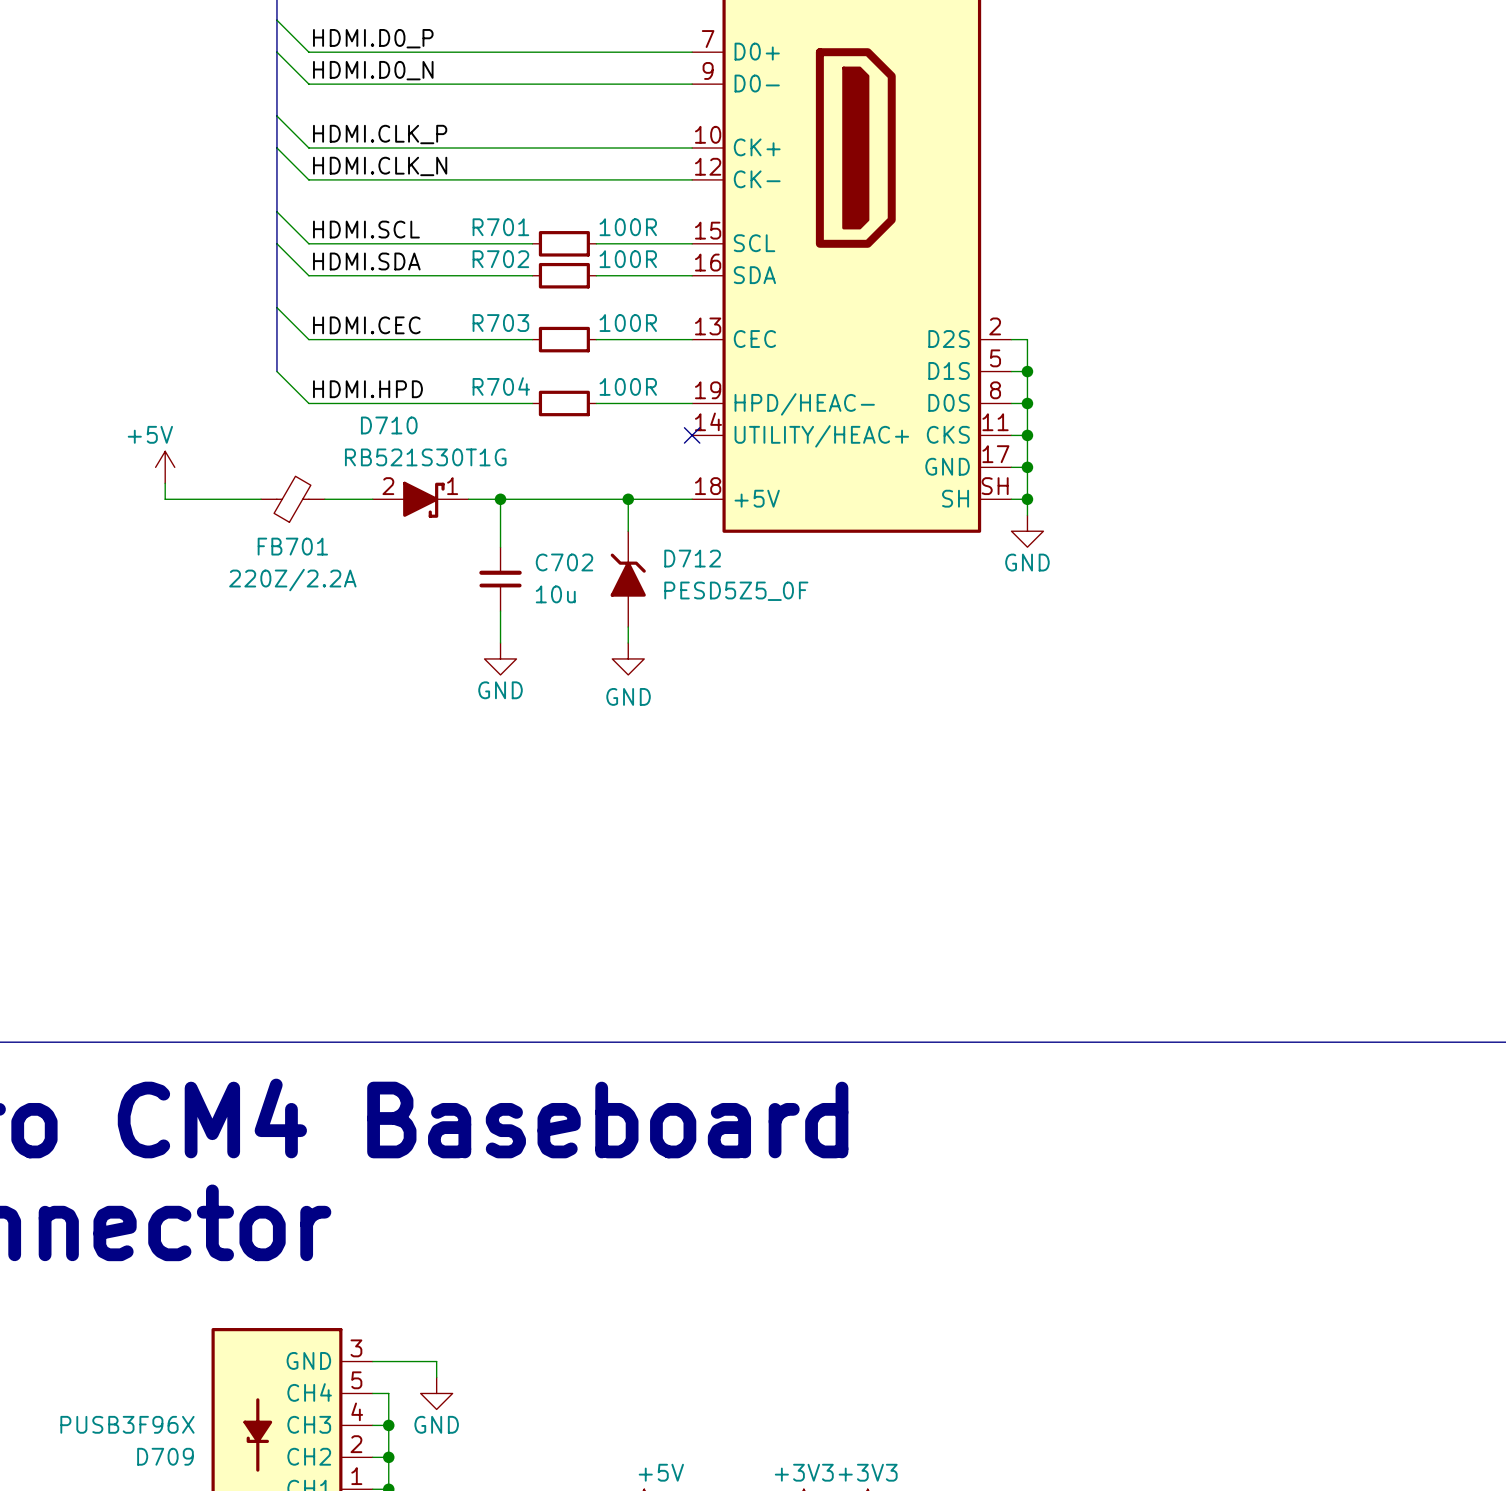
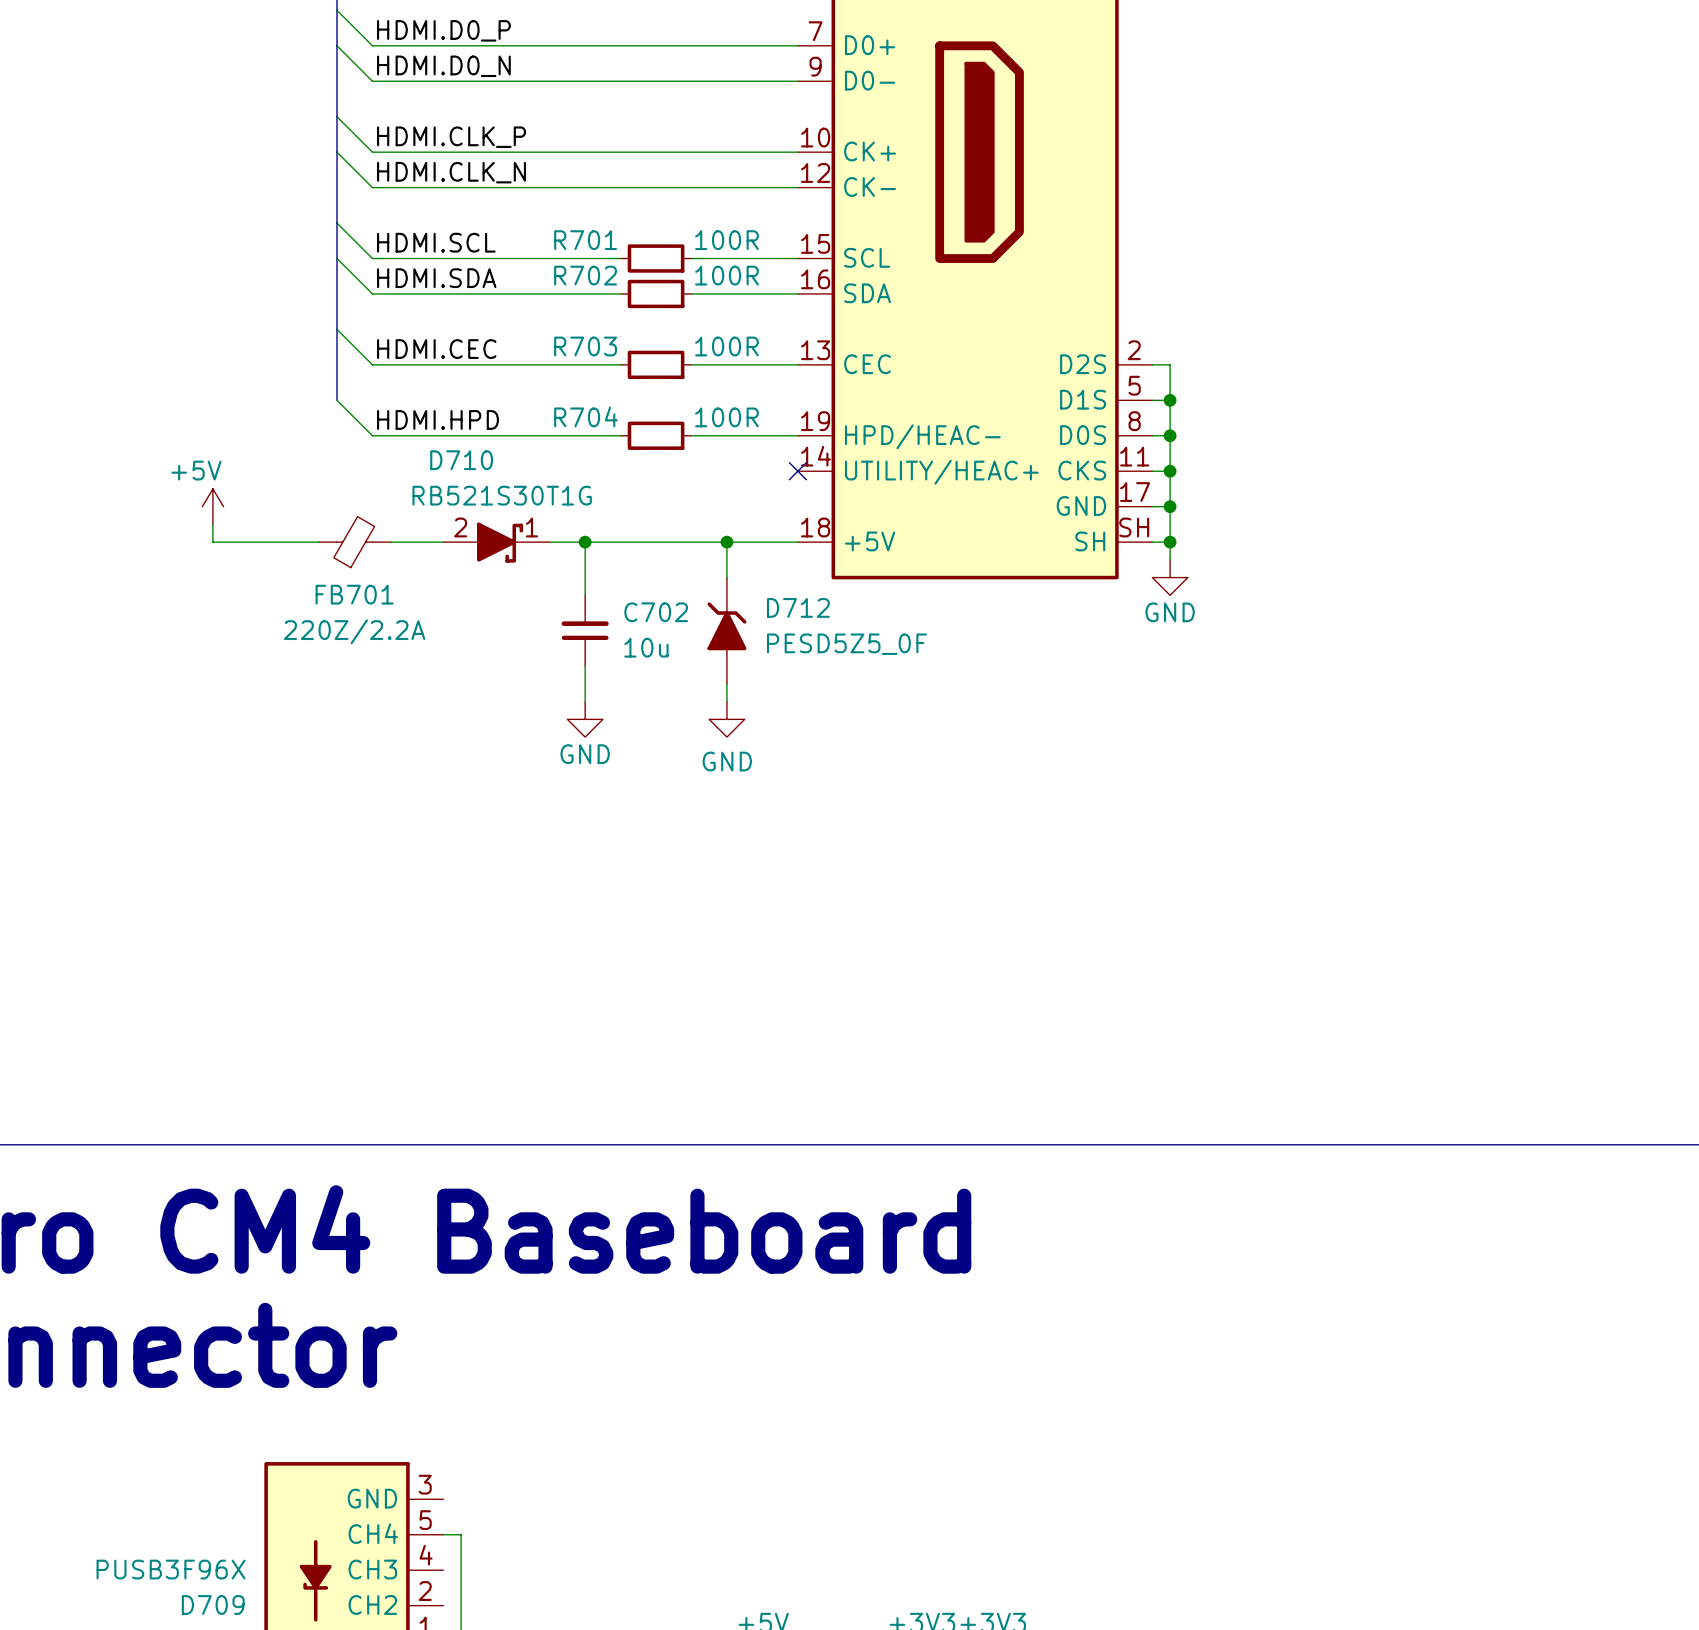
wire: (372, 1361) (436, 1361) (436, 1377) -> none
power symbol: GND (436, 1393) -> none
wire: (372, 1425) (388, 1425) -> none
junction: (388, 1425) -> none
wire: (372, 1457) (388, 1457) -> none
junction: (388, 1457) -> none

